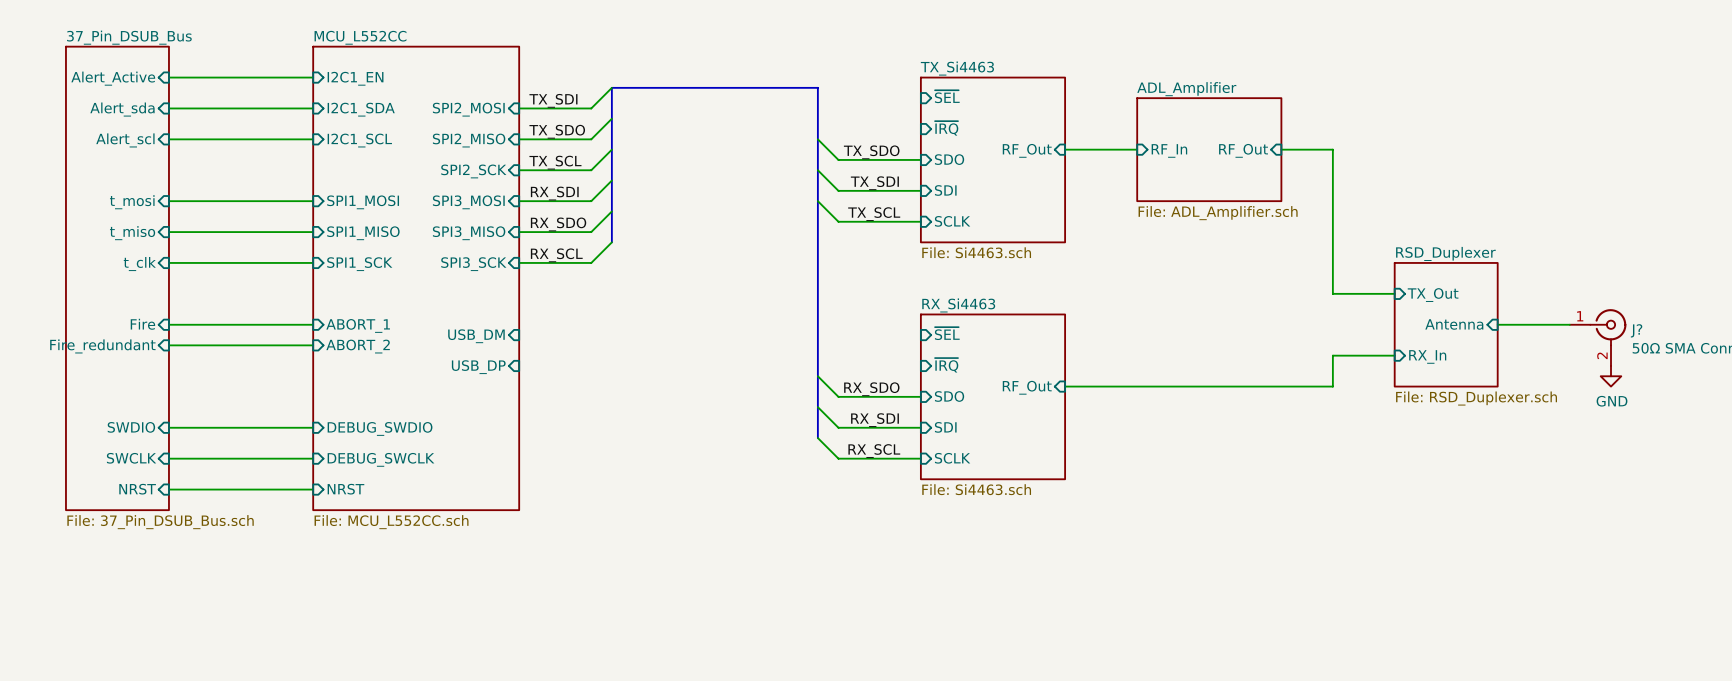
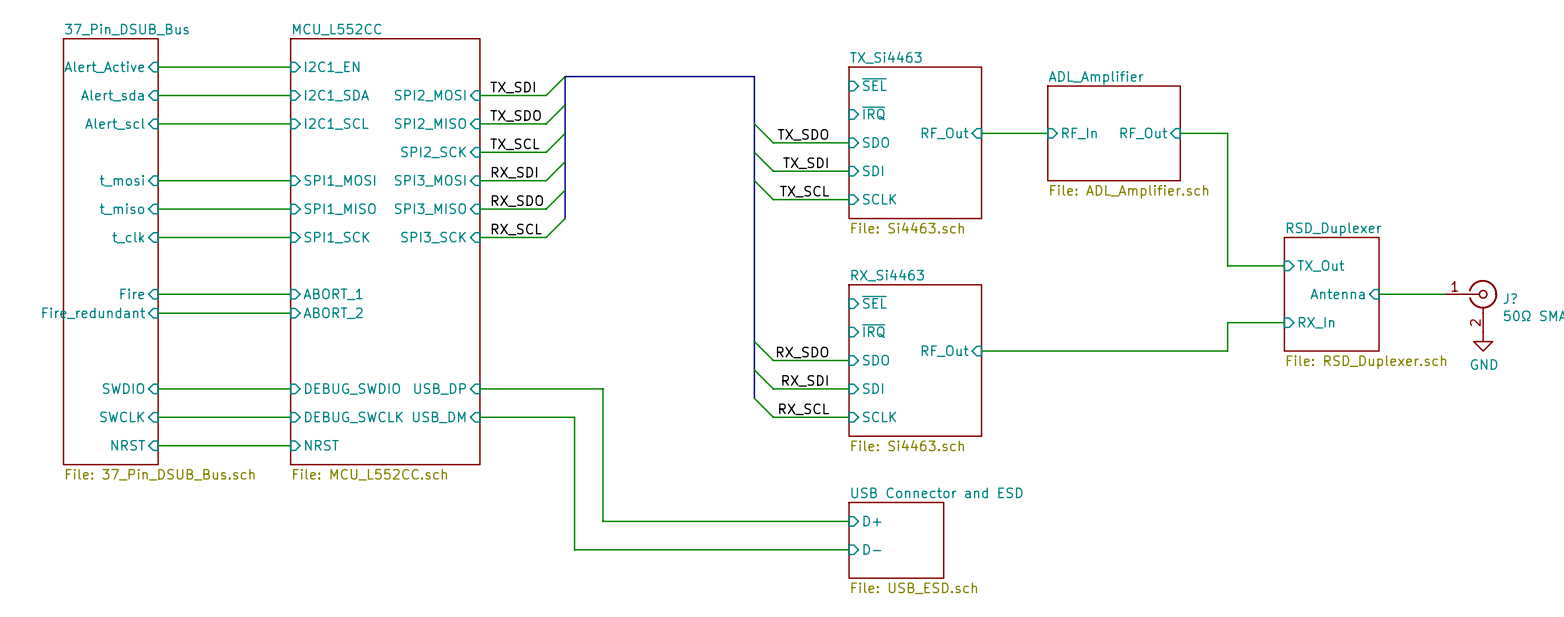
sheet pin position: USB_DM (476, 336) -> USB_DM (439, 417)
sheet pin position: USB_DP (478, 367) -> USB_DP (440, 389)
wire: none -> (479, 388) (602, 388) (602, 521) (849, 521)
wire: none -> (479, 417) (574, 417) (574, 549) (849, 549)
sheet pin: none -> D+ (872, 521)
sheet USB Connector and ESD: none -> File: USB_ESD.sch (896, 540)
sheet pin: none -> D- (872, 549)

